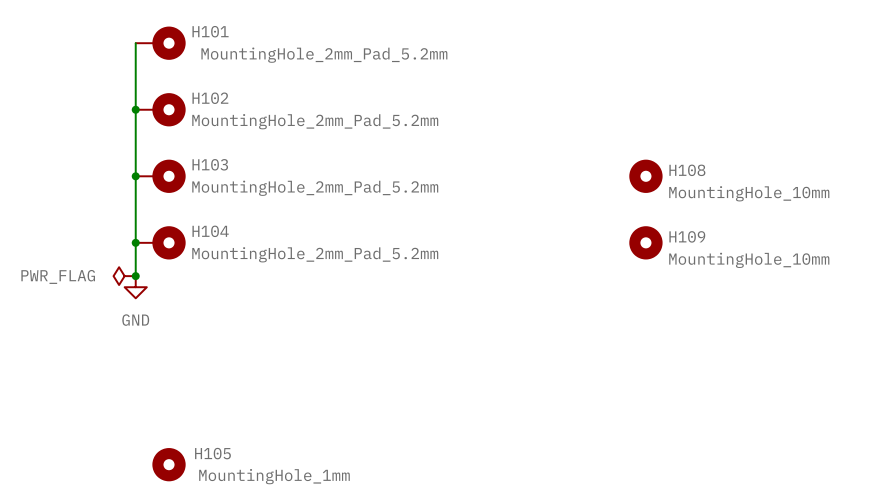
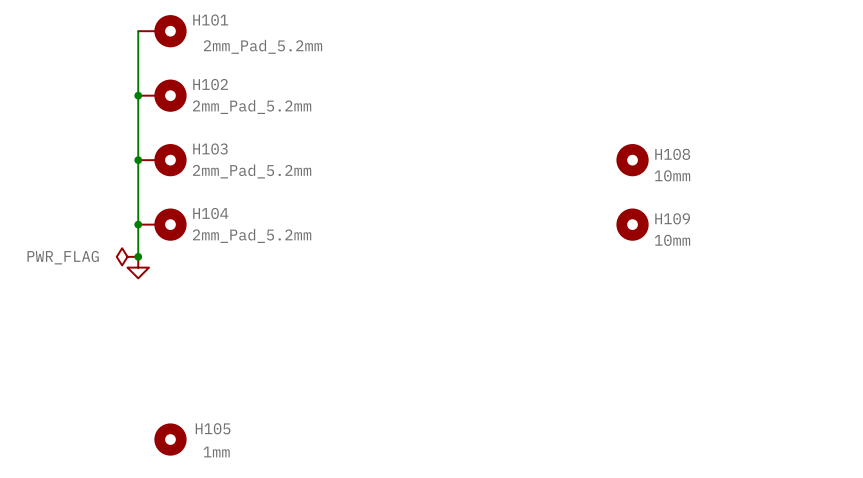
H101 value: MountingHole_2mm_Pad_5.2mm (324, 55) -> 2mm_Pad_5.2mm (262, 46)
H102 value: MountingHole_2mm_Pad_5.2mm (315, 121) -> 2mm_Pad_5.2mm (252, 106)
H103 value: MountingHole_2mm_Pad_5.2mm (315, 188) -> 2mm_Pad_5.2mm (252, 171)
H108 value: MountingHole_10mm (749, 193) -> 10mm (672, 175)
H104 value: MountingHole_2mm_Pad_5.2mm (315, 254) -> 2mm_Pad_5.2mm (252, 235)
H109 value: MountingHole_10mm (749, 260) -> 10mm (672, 240)
power symbol text: GND (135, 320) -> none
H105 value: MountingHole_1mm (274, 476) -> 1mm (216, 452)

